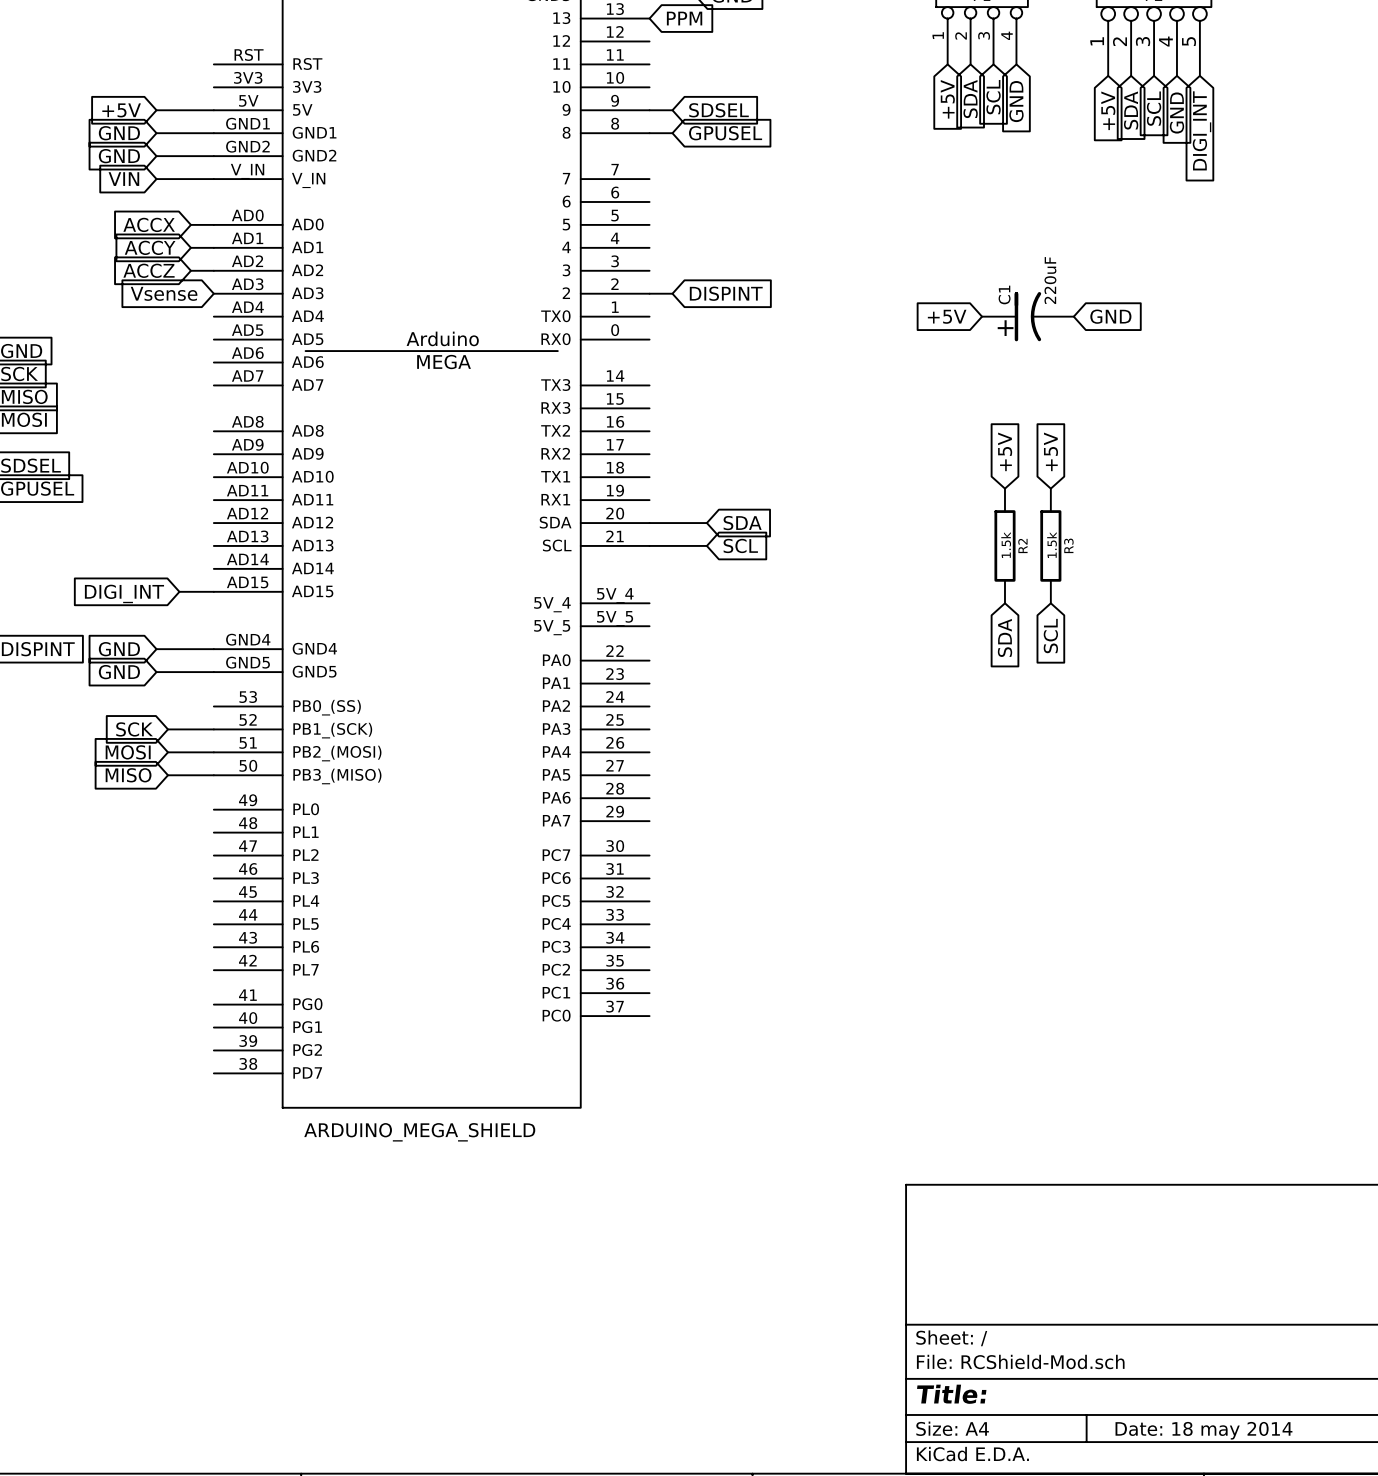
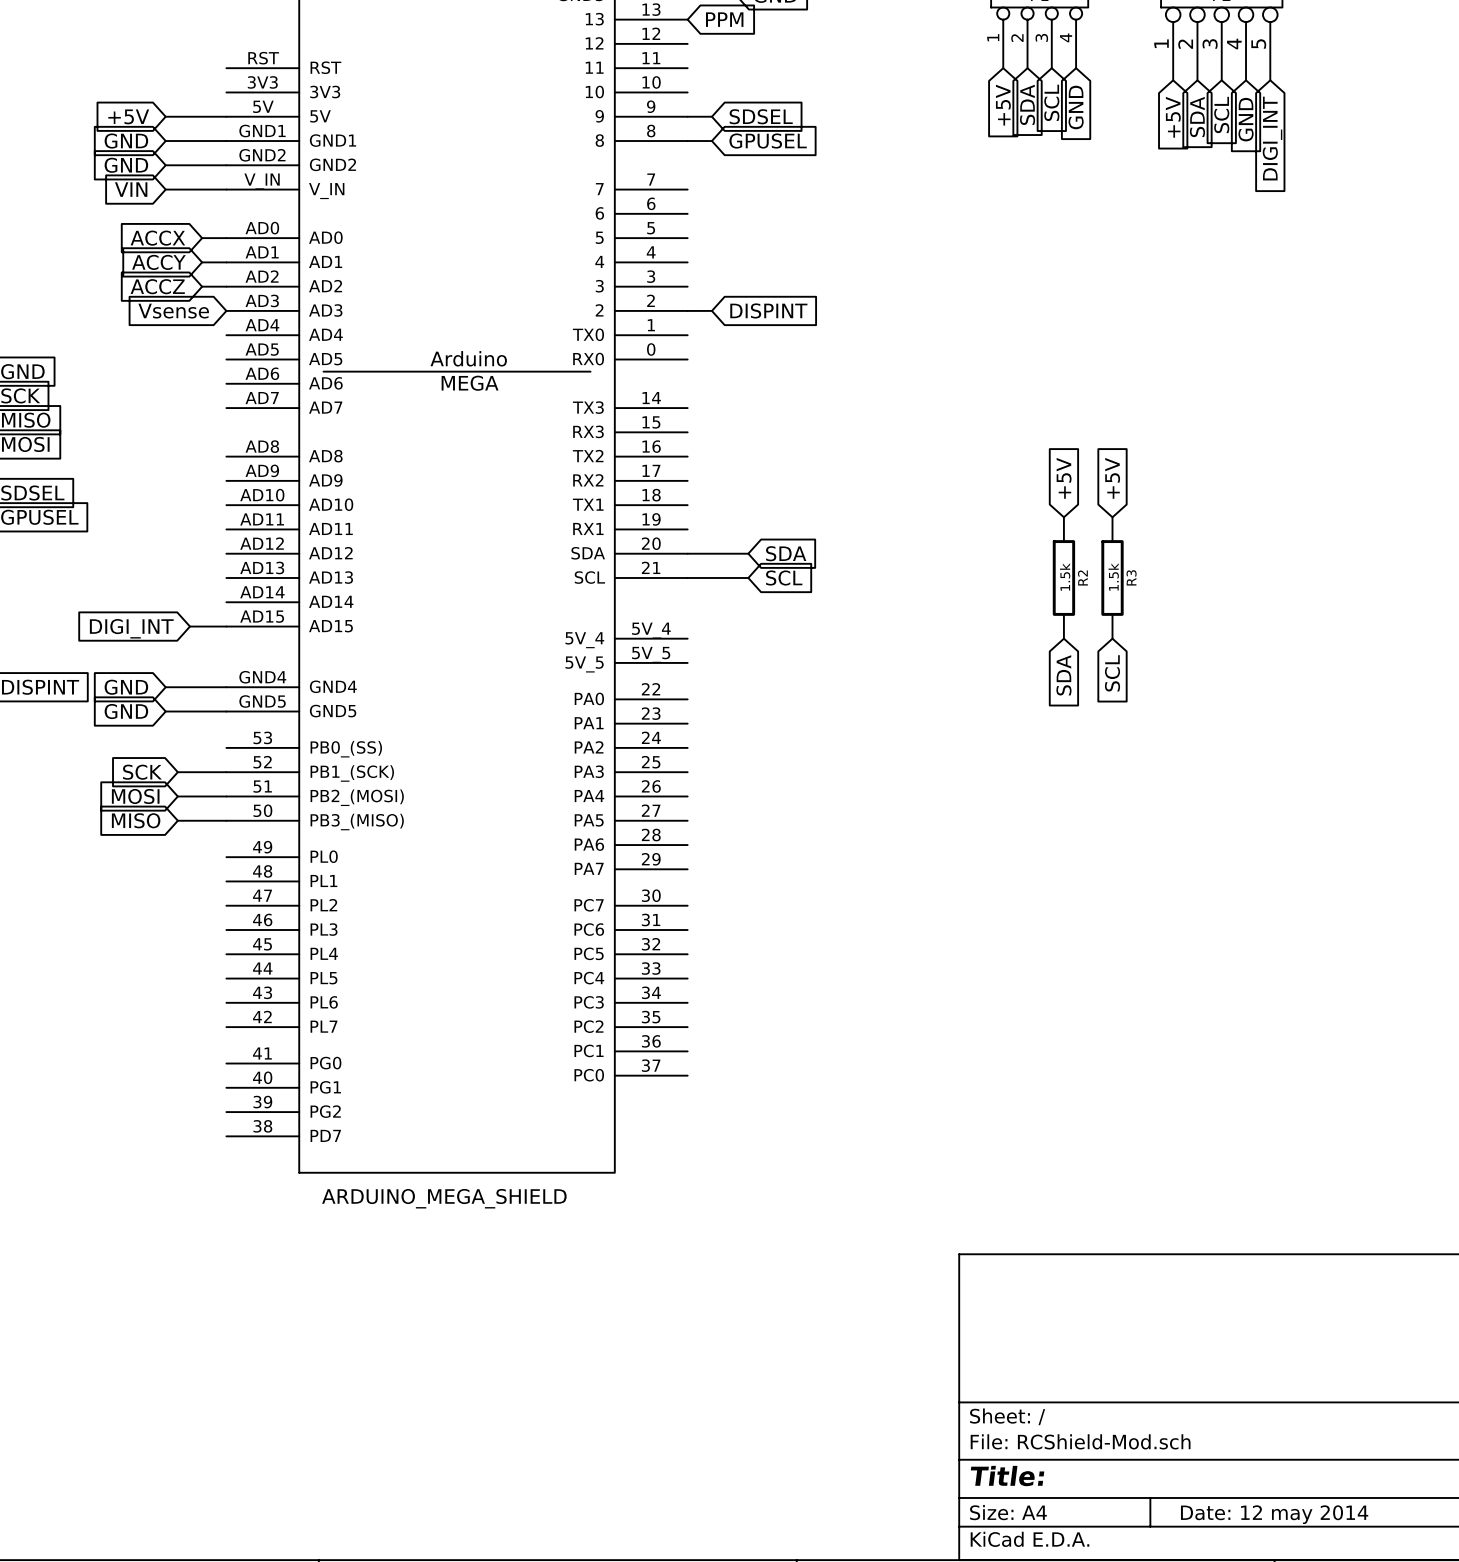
global label: +5V (947, 316) -> none
C1: 220uF (1027, 316) -> none
global label: GND (1110, 316) -> none
title block: Date: 18 may 2014 (1203, 1430) -> Date: 12 may 2014 (1274, 1514)

